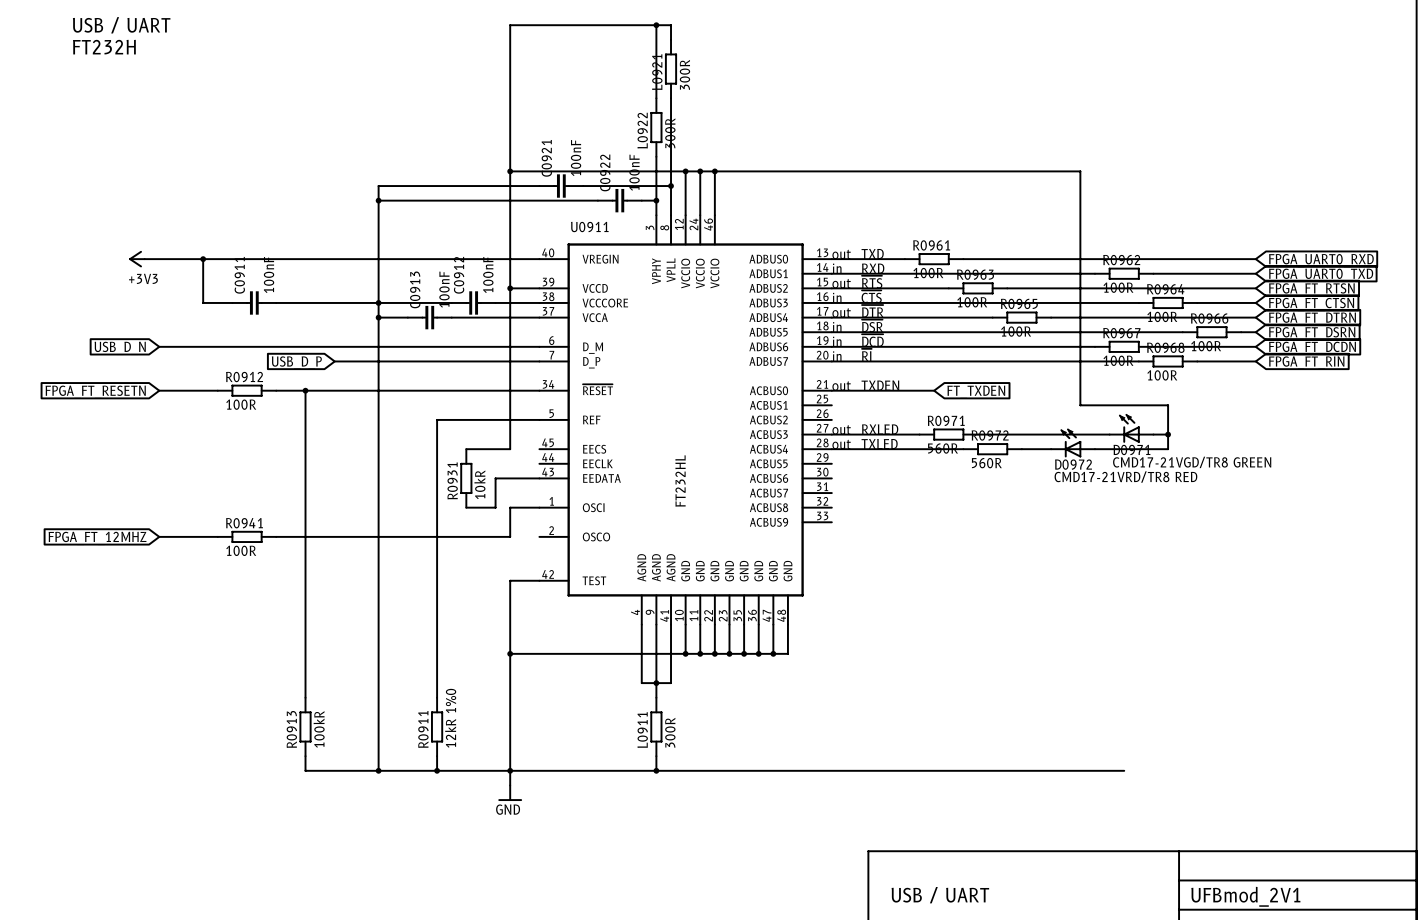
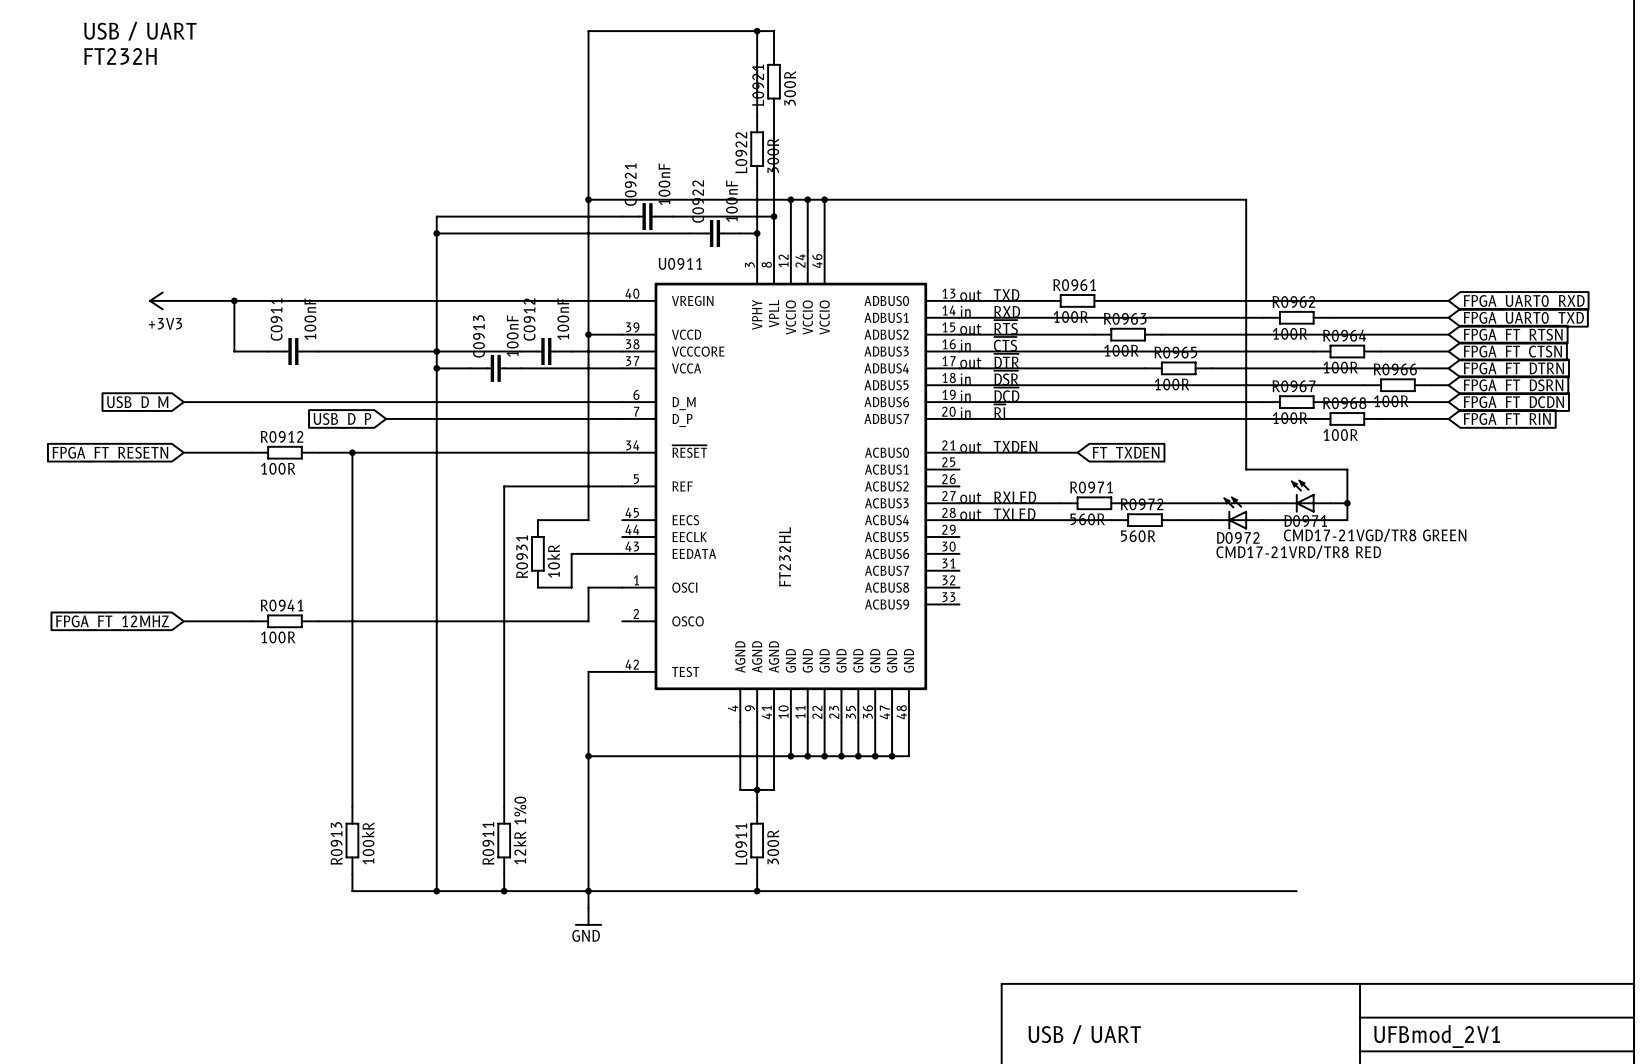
global label: USB_D_N (120, 348) -> USB_D_M (137, 403)

